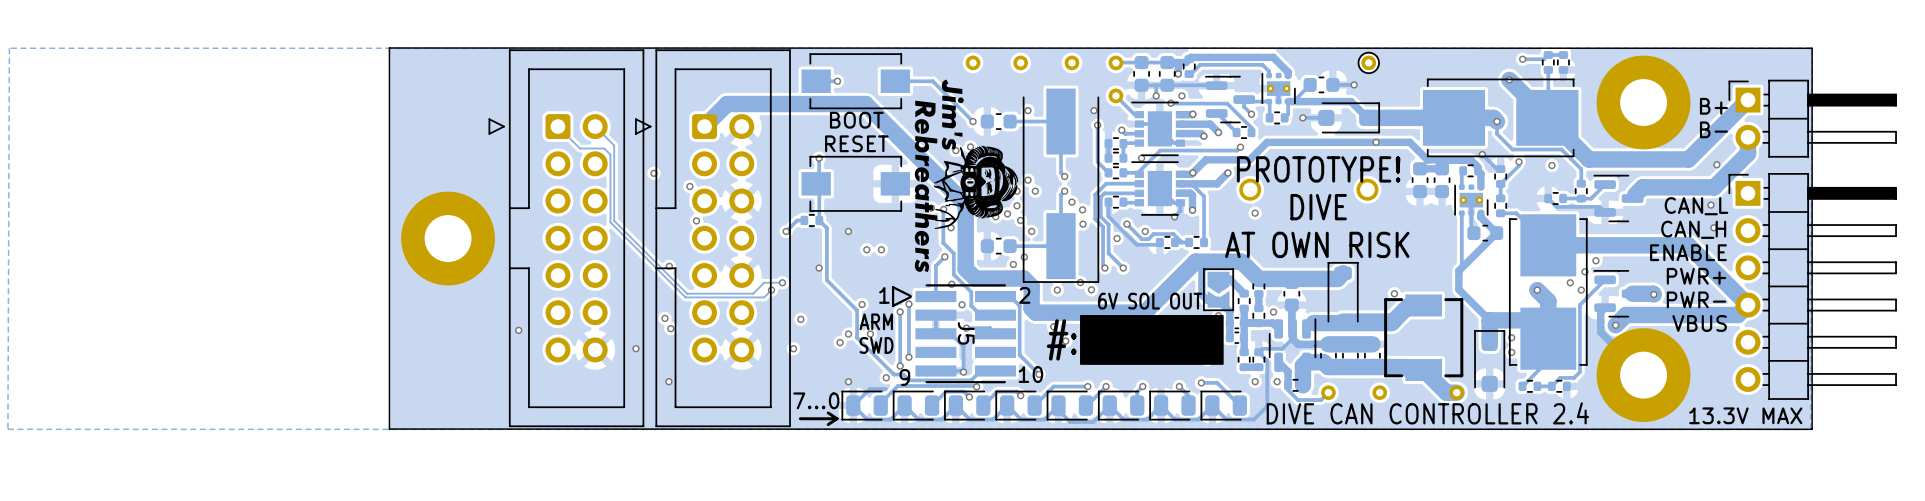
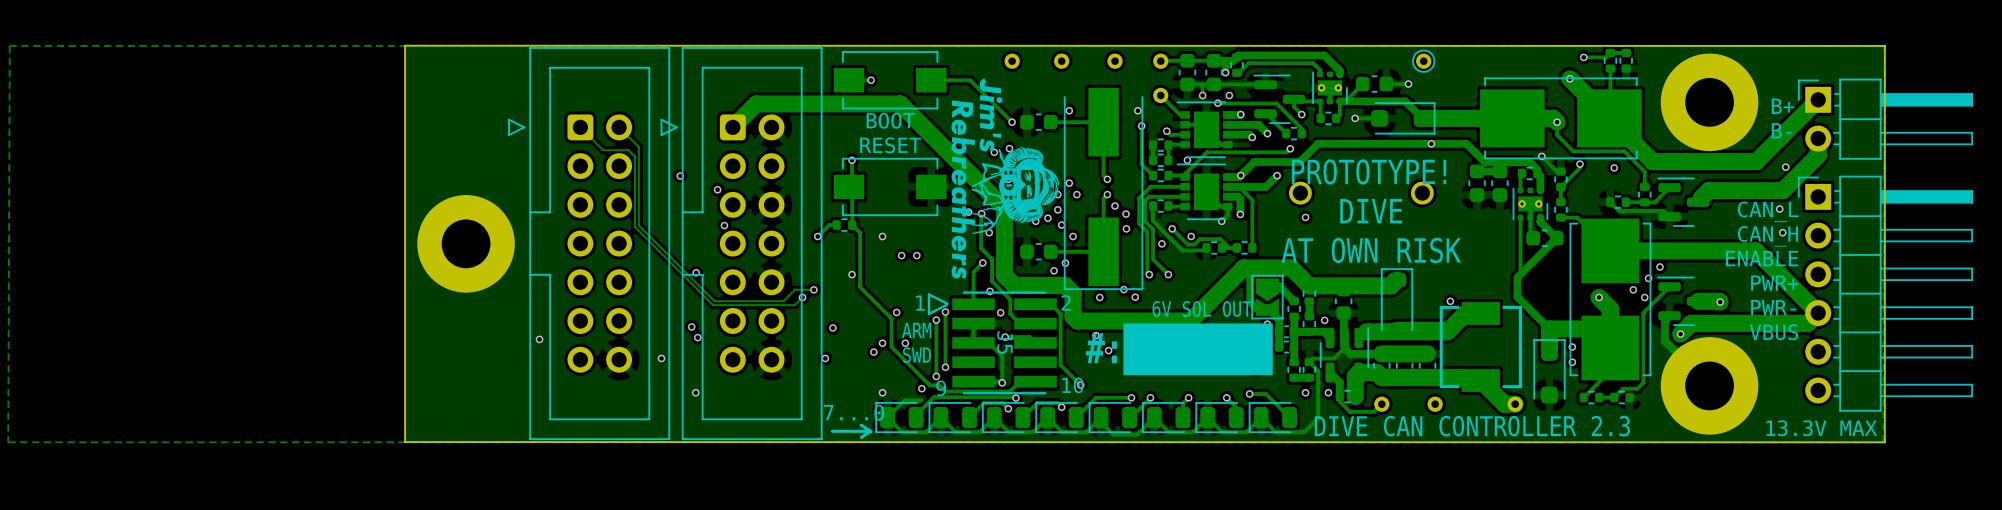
text: DIVE CAN CONTROLLER 2.4 (1427, 413) -> DIVE CAN CONTROLLER 2.3 (1472, 426)

